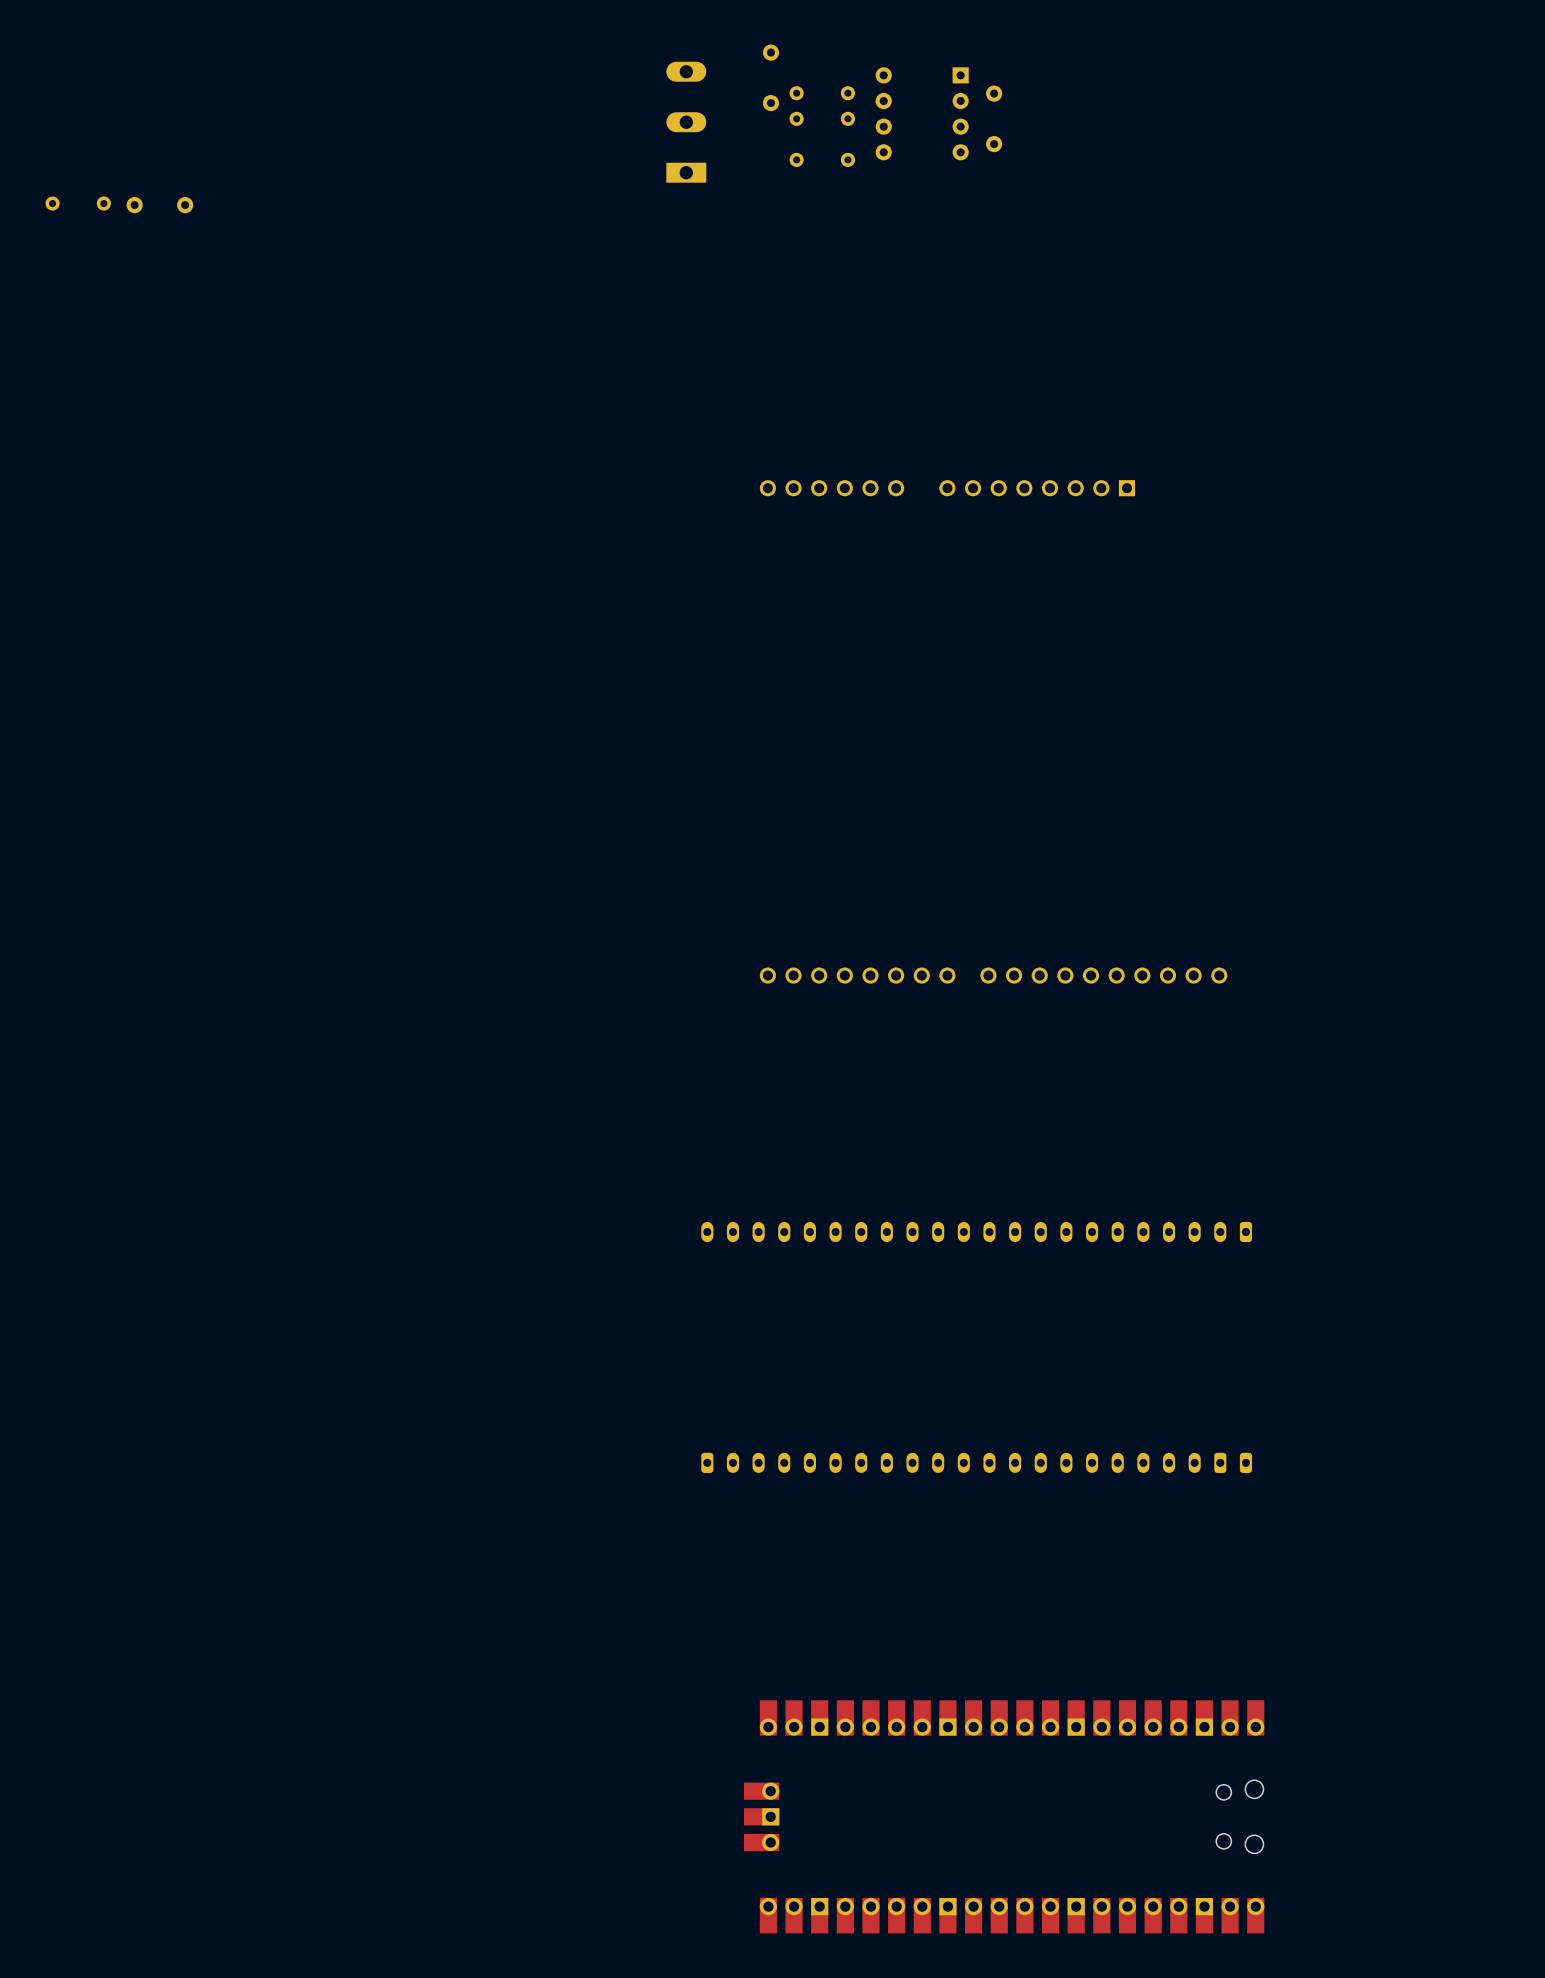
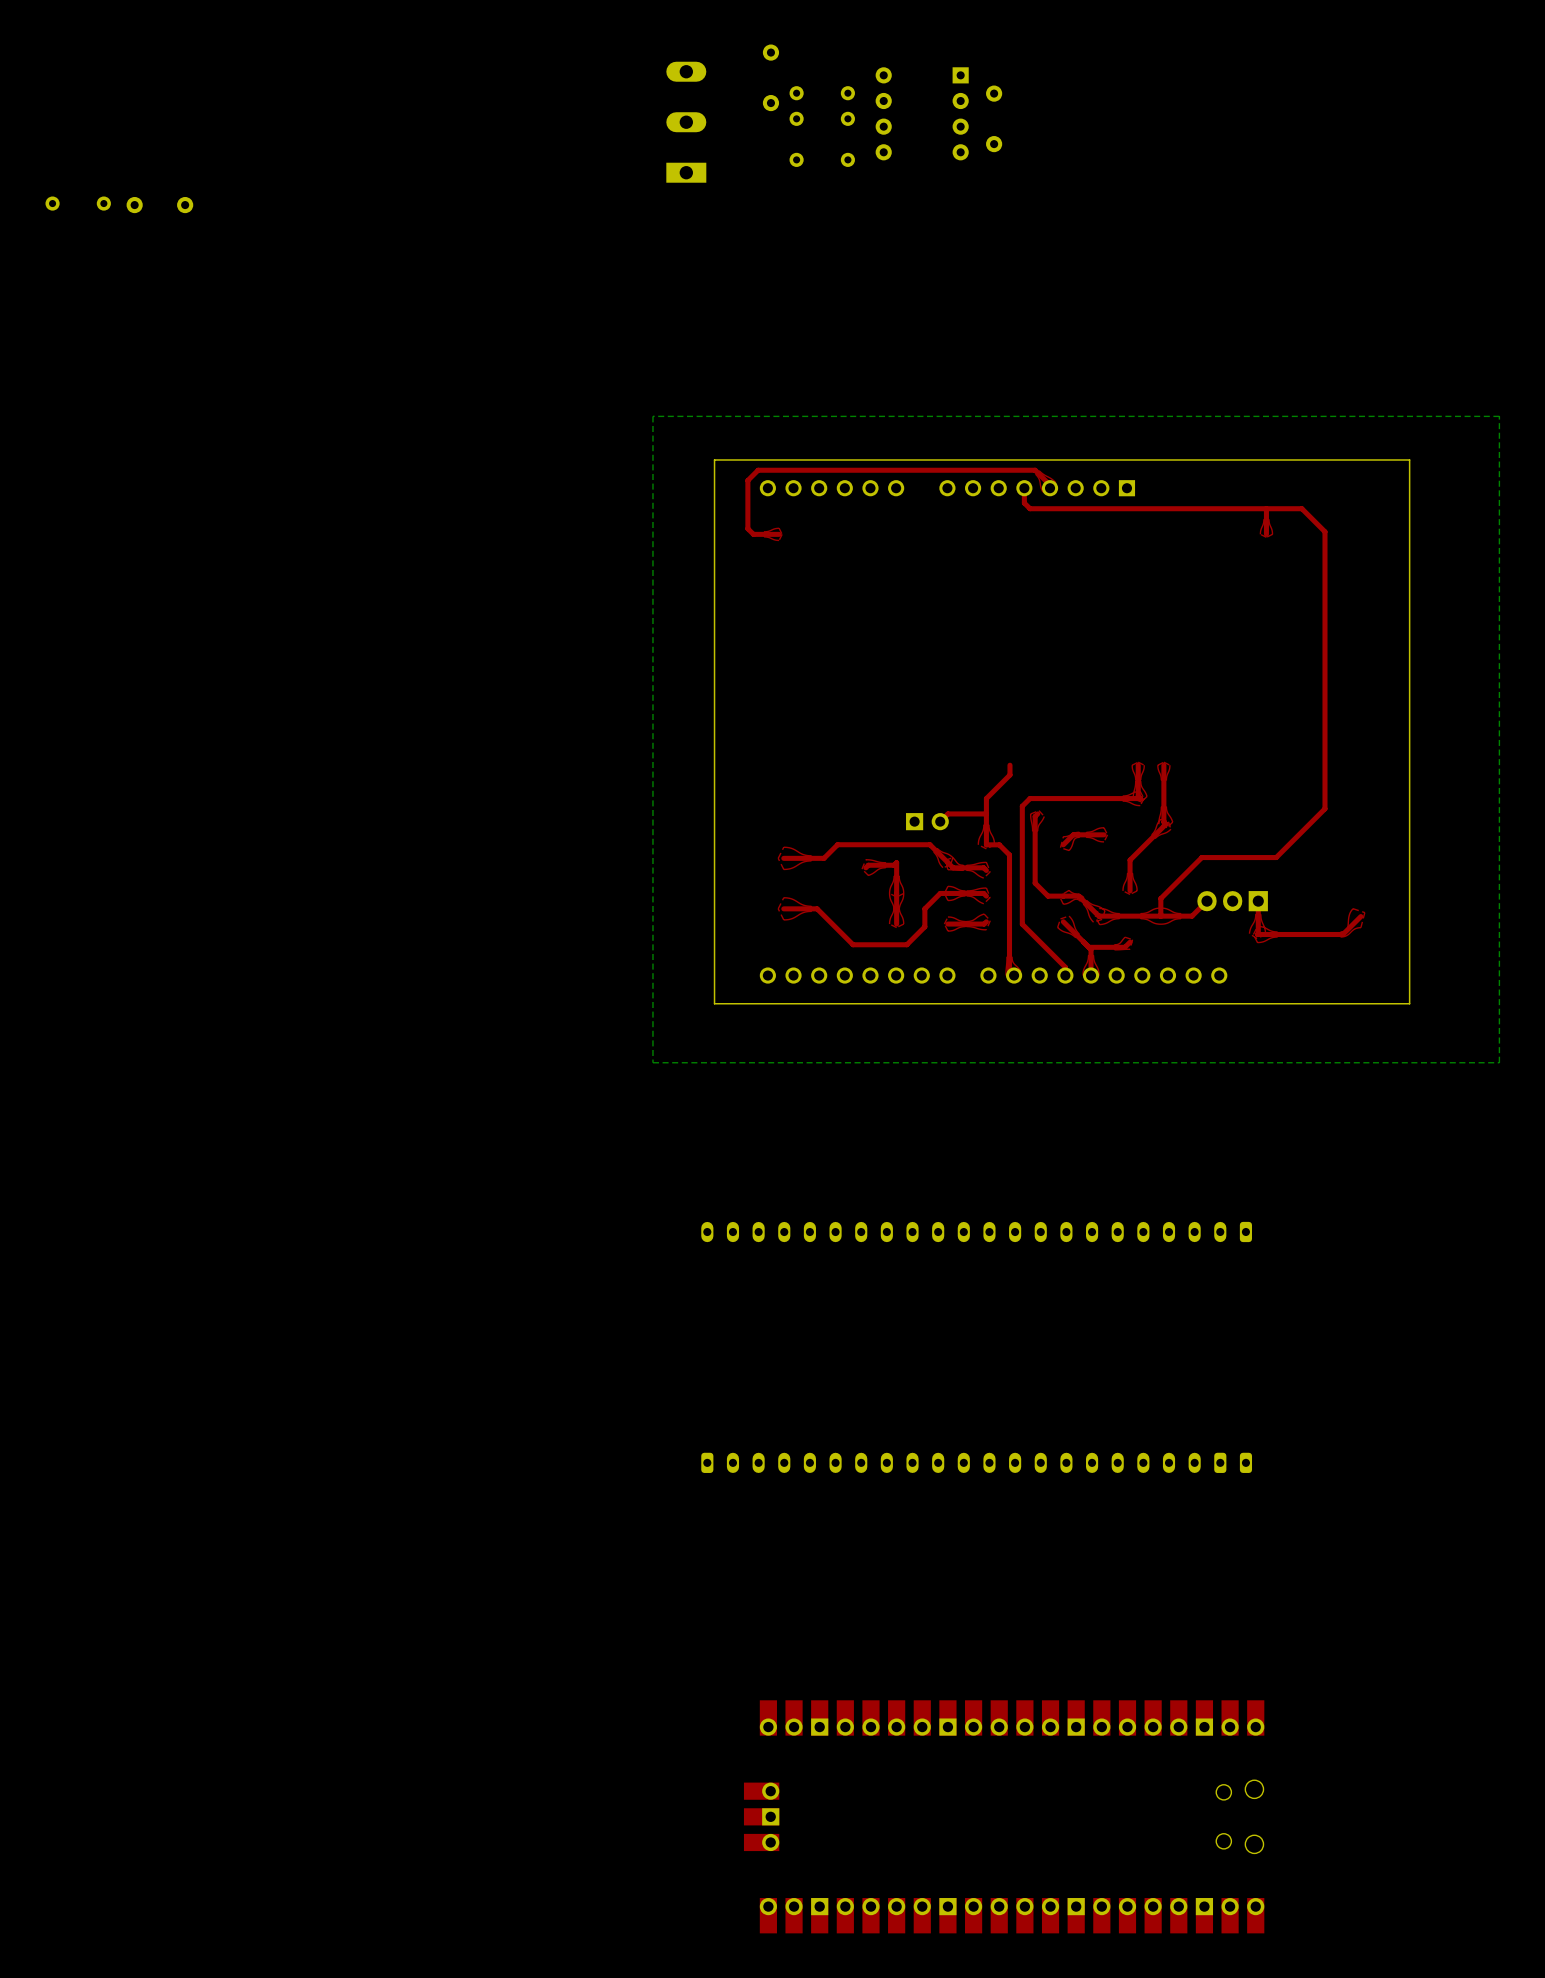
bottom zone outline: none -> (1499, 416) (1499, 1062) (652, 1062) (652, 416) (1499, 416)
board edge: none -> (1409, 459) (714, 459) (714, 1003) (1409, 1003) (1409, 459)
top zone outline: none -> (1039, 470) (1055, 482) (1052, 491) (1042, 492) (1035, 474) (1039, 470)
top track: none -> (1024, 488) (1024, 503) (1030, 508) (1301, 508) (1324, 531) (1324, 808) (1276, 857) (1201, 857) (1160, 898) (1160, 916)
top track: none -> (1050, 488) (1050, 485) (1035, 470) (758, 470) (747, 480) (747, 528) (753, 534) (779, 534)
top track: none -> (1266, 508) (1266, 534)
top zone outline: none -> (1268, 519) (1272, 534) (1266, 537) (1260, 534) (1260, 531) (1263, 519) (1268, 519)
top zone outline: none -> (779, 528) (764, 531) (764, 536) (779, 540) (782, 534) (779, 528)
top zone outline: none -> (1138, 762) (1132, 765) (1135, 780) (1140, 780) (1144, 767) (1144, 765) (1138, 762)
top zone outline: none -> (1163, 762) (1157, 765) (1161, 780) (1166, 780) (1169, 767) (1169, 765) (1163, 762)
top track: none -> (1009, 765) (1009, 774) (986, 798) (986, 844) (999, 844) (1009, 854) (1009, 970) (1014, 975)
top track: none -> (1138, 765) (1138, 796) (1140, 798) (1030, 798) (1022, 806) (1022, 924) (1065, 967) (1065, 975)
top track: none -> (1163, 765) (1163, 822) (1165, 824) (1130, 860) (1130, 890)
top zone outline: none -> (1140, 781) (1147, 796) (1141, 801) (1133, 798) (1135, 781) (1140, 781)
top zone outline: none -> (1140, 791) (1122, 796) (1122, 801) (1140, 805) (1143, 798) (1140, 791)
top zone outline: none -> (1166, 806) (1172, 822) (1166, 827) (1158, 824) (1161, 806) (1166, 806)
top zone outline: none -> (1038, 810) (1030, 813) (1032, 831) (1037, 831) (1044, 816) (1038, 810)
top track: none -> (986, 813) (947, 813) (940, 821)
top track: none -> (1037, 813) (1035, 816) (1035, 883) (1048, 896) (1078, 896) (1099, 916) (1192, 916) (1207, 901)
top zone outline: none -> (1160, 819) (1151, 834) (1155, 838) (1170, 829) (1168, 821) (1160, 819)
part: none -> (927, 821)
top zone outline: none -> (988, 824) (994, 844) (986, 848) (978, 844) (978, 842) (983, 824) (988, 824)
top zone outline: none -> (1104, 827) (1086, 832) (1086, 837) (1104, 841) (1107, 834) (1104, 827)
top zone outline: none -> (1079, 832) (1063, 836) (1060, 847) (1069, 850) (1074, 839) (1079, 837) (1079, 832)
top track: none -> (1104, 834) (1073, 834) (1063, 844)
top zone outline: none -> (783, 847) (778, 858) (783, 869) (811, 860) (811, 855) (783, 847)
top zone outline: none -> (952, 857) (937, 848) (933, 852) (942, 867) (950, 865) (952, 857)
top zone outline: none -> (952, 857) (945, 860) (947, 869) (963, 870) (963, 865) (958, 863) (952, 857)
top track: none -> (783, 858) (824, 858) (837, 844) (929, 844) (953, 867) (983, 867) (986, 870)
top zone outline: none -> (865, 859) (862, 869) (868, 875) (880, 868) (885, 867) (885, 862) (865, 859)
top zone outline: none -> (986, 862) (966, 865) (966, 870) (972, 871) (983, 878) (990, 871) (986, 862)
top track: none -> (865, 867) (868, 865) (894, 865) (896, 862) (896, 924)
top zone outline: none -> (1132, 873) (1137, 890) (1130, 894) (1122, 890) (1123, 887) (1127, 873) (1132, 873)
top zone outline: none -> (947, 886) (965, 890) (965, 895) (947, 900) (944, 893) (947, 886)
top zone outline: none -> (986, 888) (966, 890) (966, 895) (972, 896) (983, 903) (990, 897) (986, 888)
top zone outline: none -> (1069, 890) (1080, 895) (1083, 897) (1080, 901) (1075, 899) (1063, 904) (1059, 896) (1069, 890)
top zone outline: none -> (903, 893) (899, 875) (894, 875) (889, 893)
top zone outline: none -> (903, 893) (896, 896) (889, 893)
top zone outline: none -> (903, 893) (899, 911) (894, 911) (889, 893)
top track: none -> (986, 896) (983, 893) (940, 893) (924, 908) (924, 926) (906, 944) (853, 944) (817, 908) (783, 908)
top zone outline: none -> (783, 897) (778, 908) (783, 919) (811, 911) (811, 906) (783, 897)
top zone outline: none -> (1086, 900) (1104, 910) (1102, 919) (1093, 922) (1092, 920) (1083, 904) (1086, 900)
part: none -> (1232, 901)
top track: none -> (1258, 901) (1257, 934) (1342, 934) (1360, 916)
top zone outline: none -> (899, 906) (903, 924) (896, 927) (889, 924) (889, 920) (894, 906) (899, 906)
top zone outline: none -> (1101, 908) (1099, 908) (1095, 916) (1099, 924) (1119, 918) (1119, 913) (1101, 908)
top zone outline: none -> (1160, 908) (1180, 913) (1180, 918) (1160, 924) (1140, 918) (1140, 913) (1160, 908)
top zone outline: none -> (1353, 908) (1349, 914) (1347, 928) (1340, 931) (1340, 937) (1360, 927) (1364, 912) (1353, 908)
top zone outline: none -> (984, 914) (966, 921) (966, 926) (986, 929) (990, 920) (984, 914)
top zone outline: none -> (1260, 914) (1265, 934) (1257, 938) (1249, 933) (1249, 931) (1255, 914) (1260, 914)
top zone outline: none -> (947, 916) (944, 924) (947, 931) (965, 926) (965, 921) (947, 916)
top zone outline: none -> (1069, 916) (1060, 918) (1057, 927) (1075, 937) (1079, 934) (1069, 916)
top track: none -> (986, 921) (984, 924) (947, 924)
top track: none -> (1063, 921) (1091, 949) (1091, 975)
top zone outline: none -> (1259, 926) (1257, 926) (1253, 934) (1257, 942) (1277, 937) (1277, 931) (1259, 926)
top zone outline: none -> (1125, 937) (1119, 943) (1114, 944) (1114, 949) (1130, 949) (1132, 939) (1125, 937)
top track: none -> (1130, 942) (1124, 947) (1088, 947)
top zone outline: none -> (1093, 955) (1099, 975) (1091, 979) (1082, 975) (1083, 973) (1088, 955) (1093, 955)
top zone outline: none -> (1012, 956) (1013, 962) (1020, 970) (1016, 978) (1006, 975) (1006, 956) (1012, 956)

